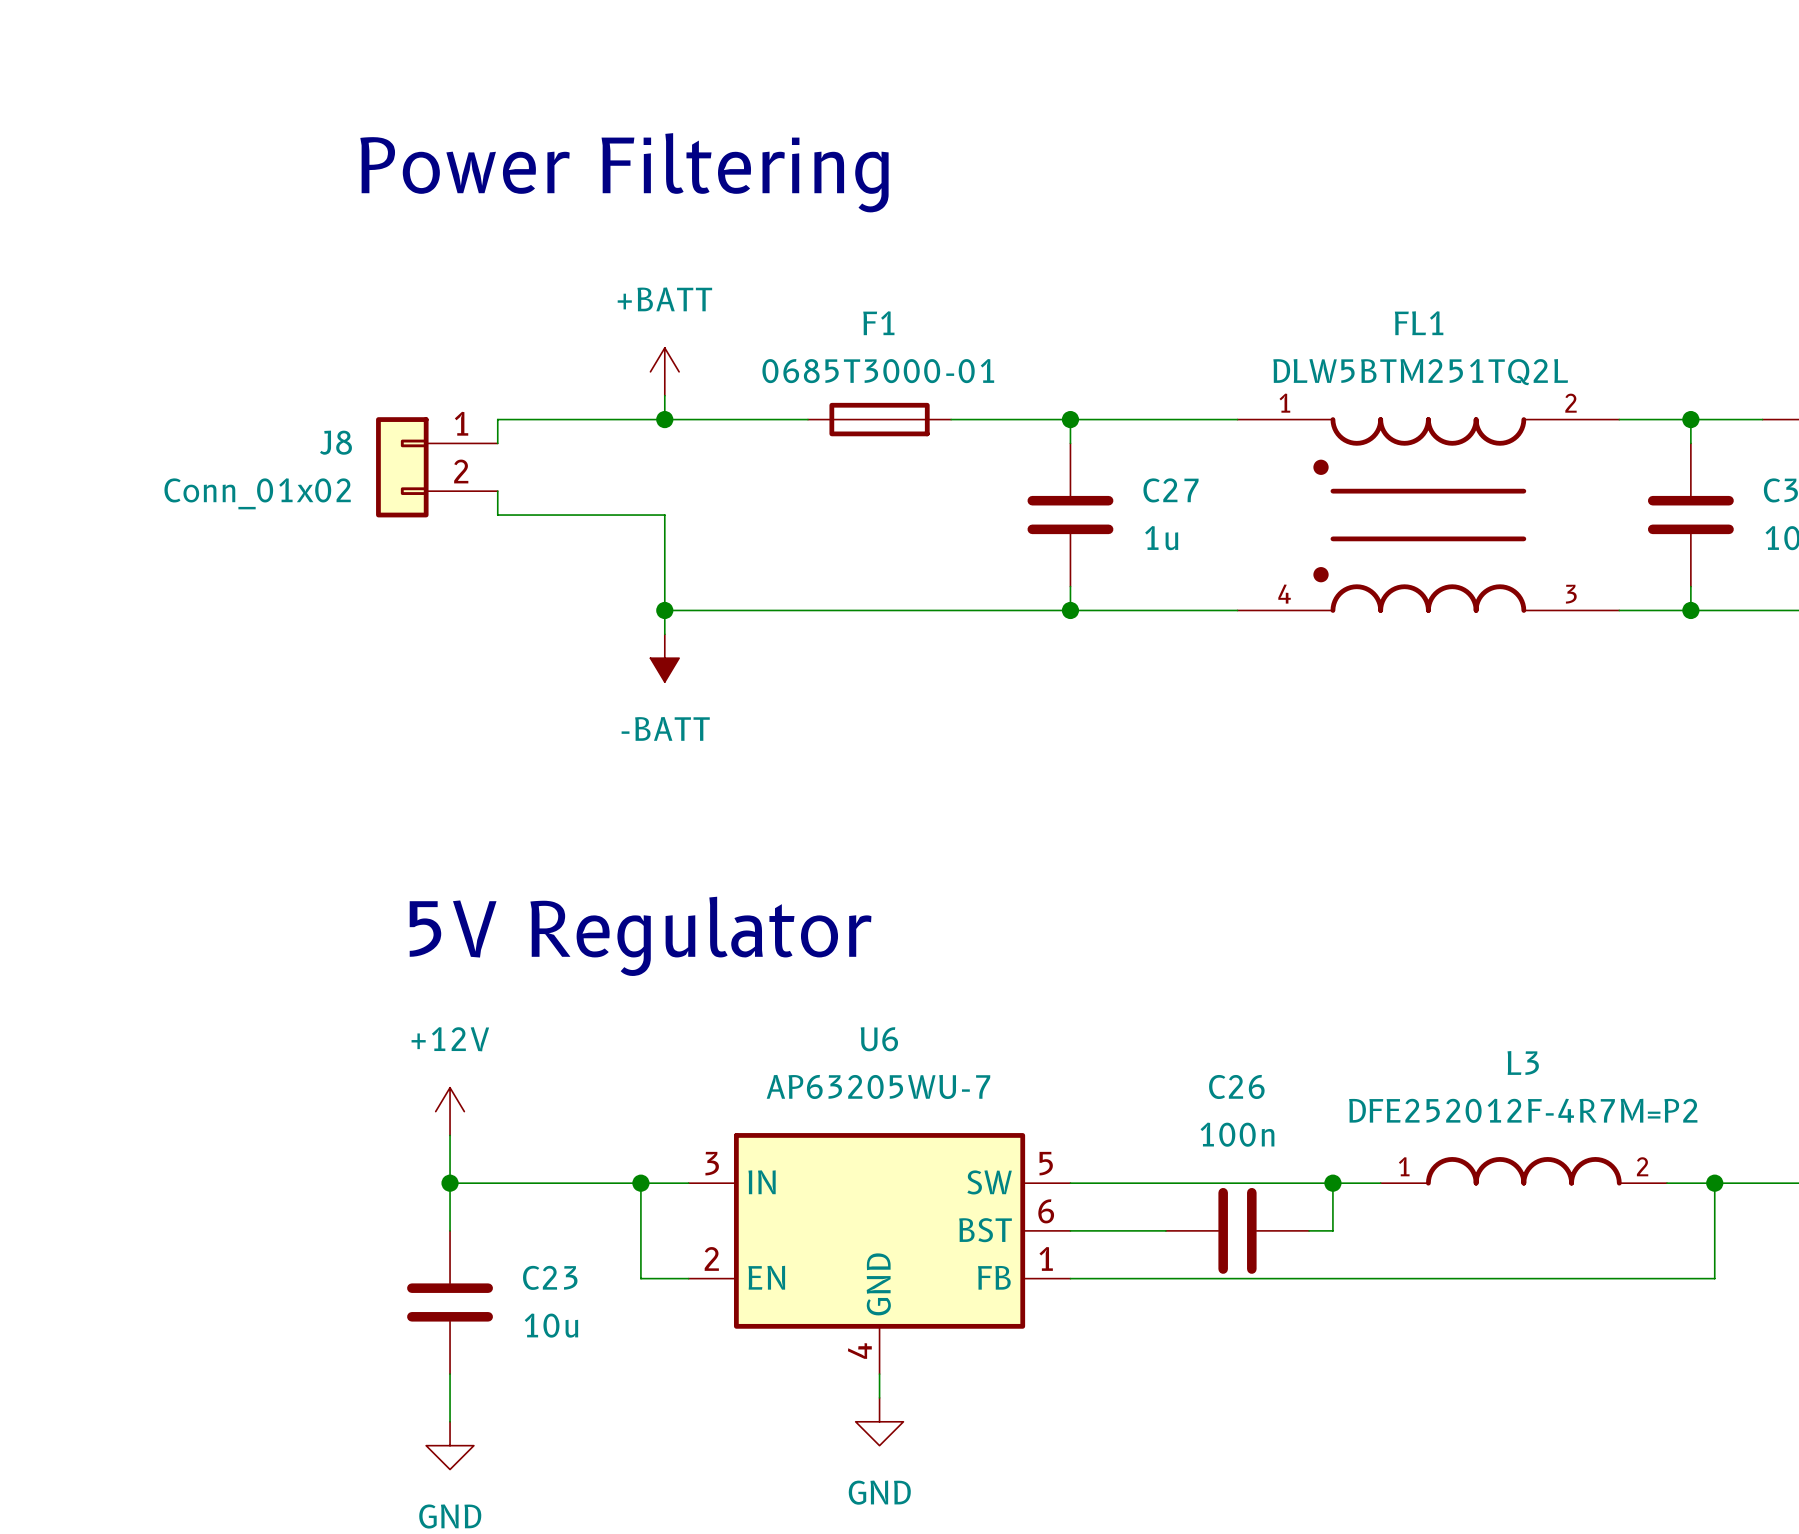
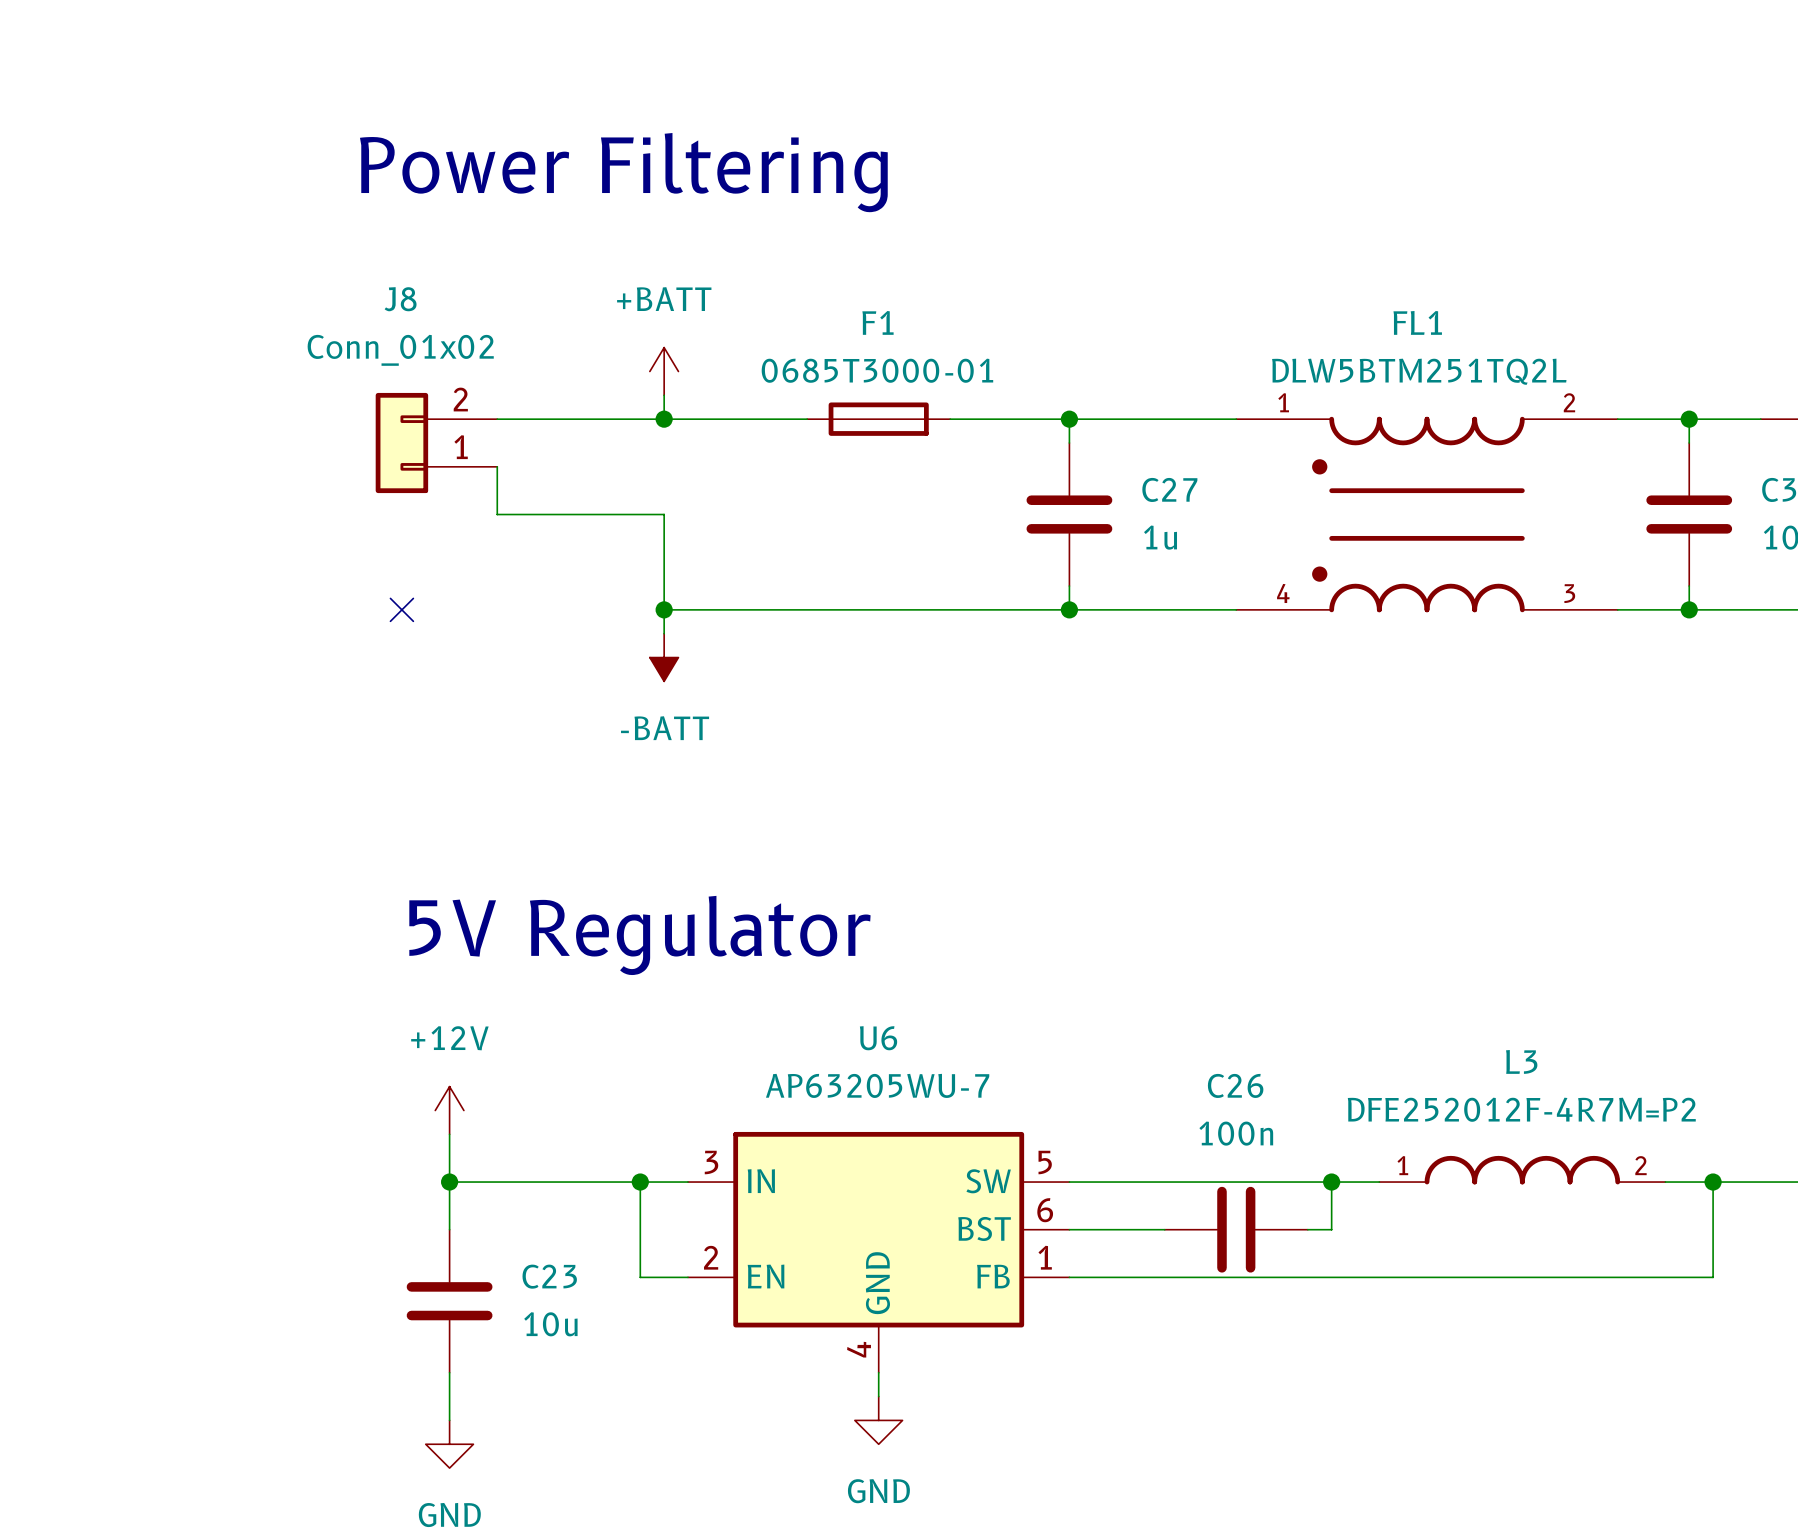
wire: (497, 419) (497, 443) -> (497, 466) (497, 490)
J8 name position: J8 (335, 442) -> J8 (400, 299)
J8 flip: as is (402, 467) -> up-down (401, 443)
J8 value position: Conn_01x02 (257, 493) -> Conn_01x02 (400, 350)
no-connect mark: none -> (401, 609)

